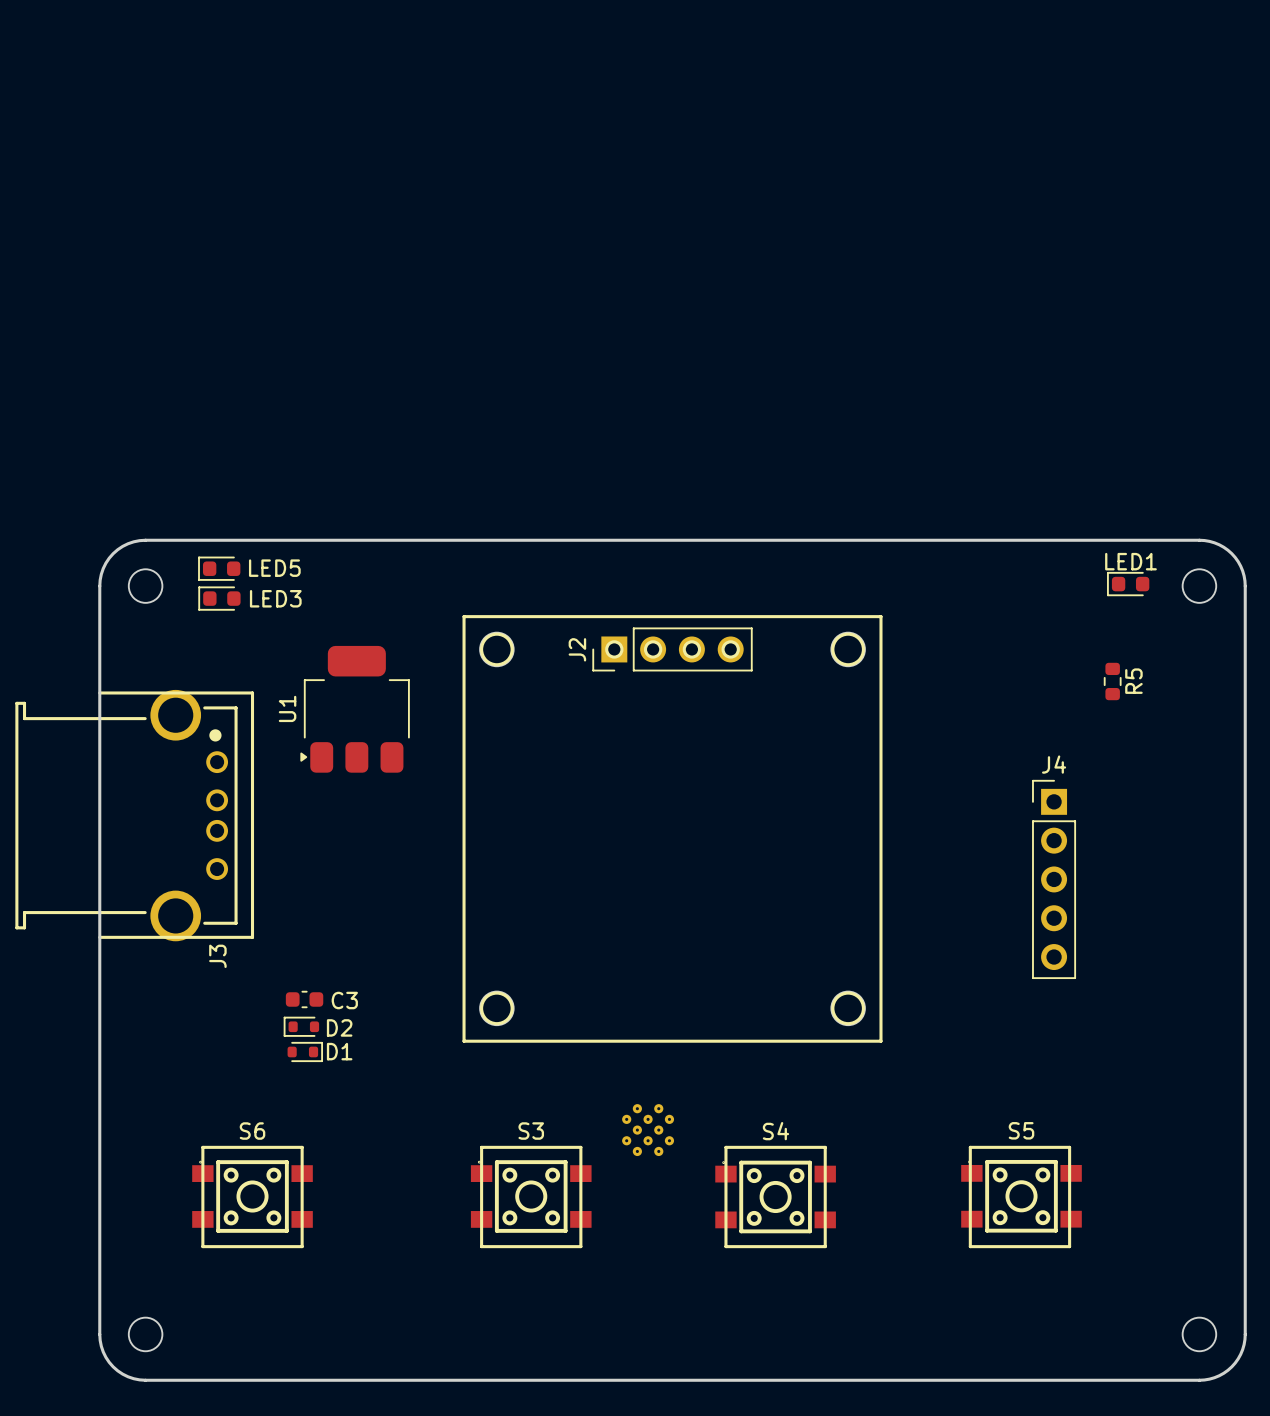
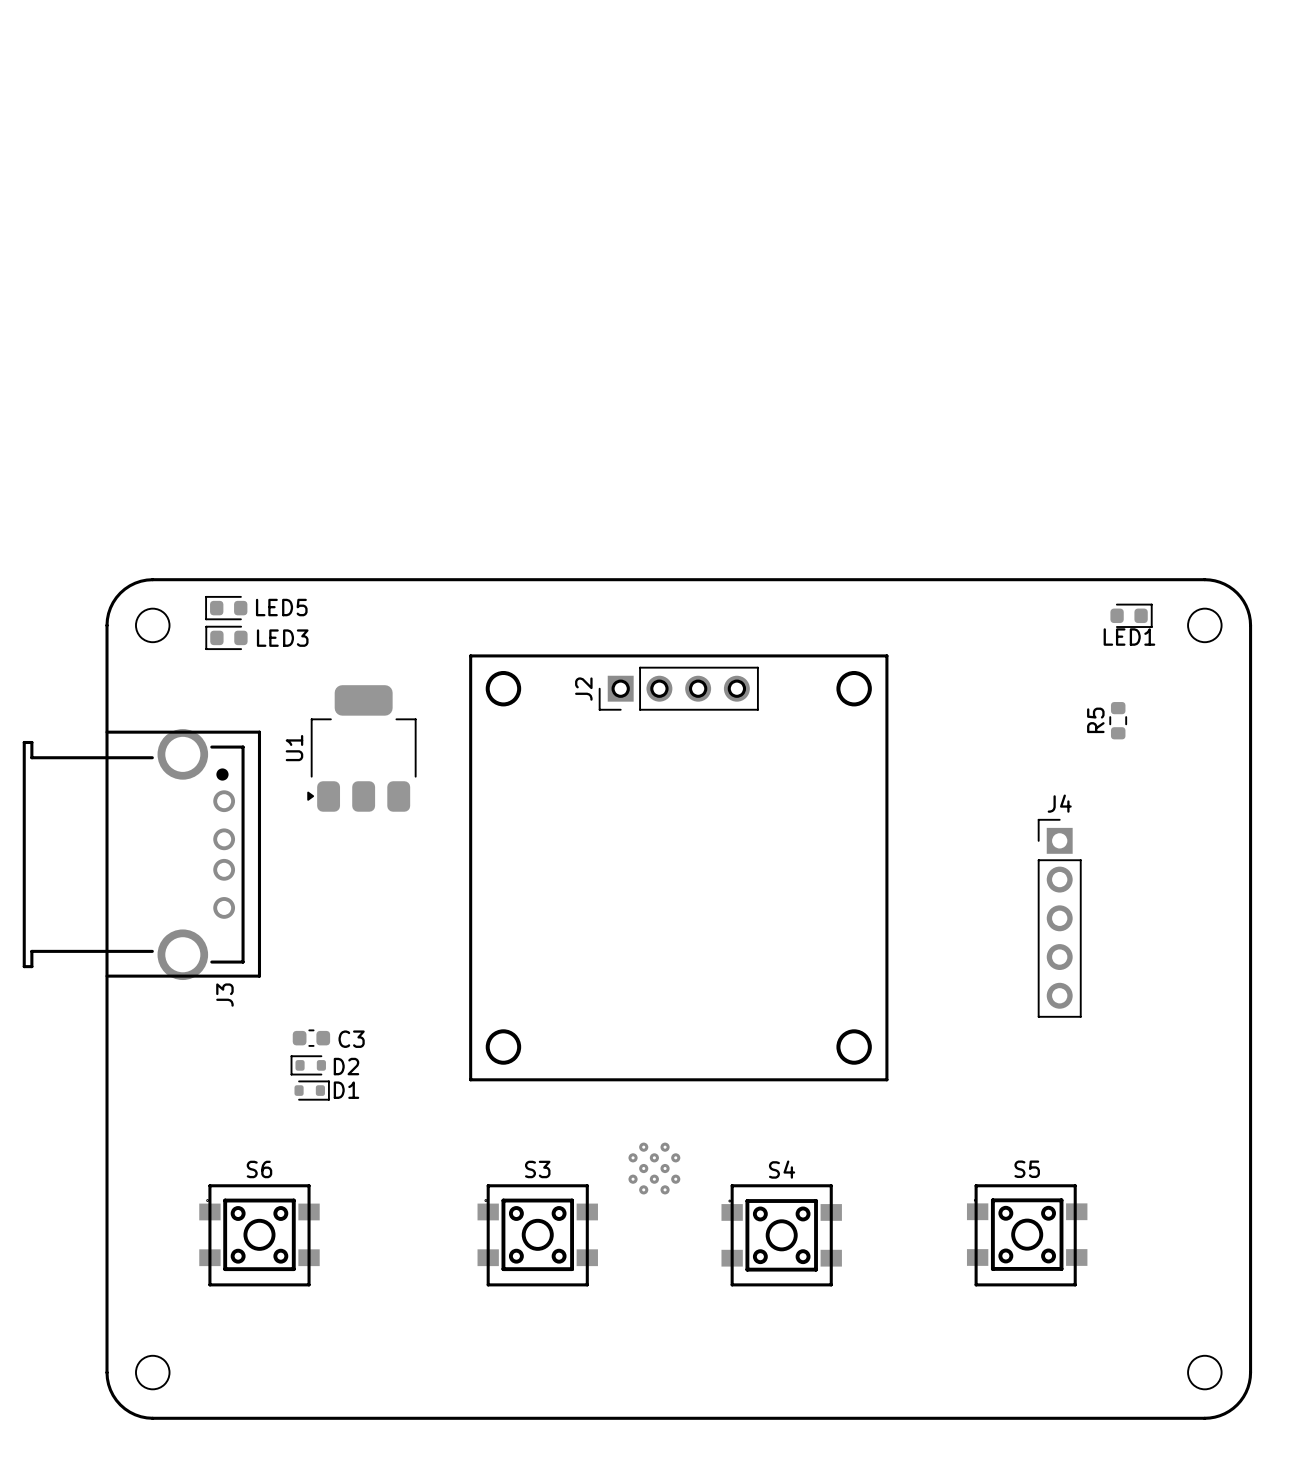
LED1 rotation: 0° (1128, 584) -> 180° (1131, 615)
R5 name position: R5 (1133, 681) -> R5 (1095, 720)

